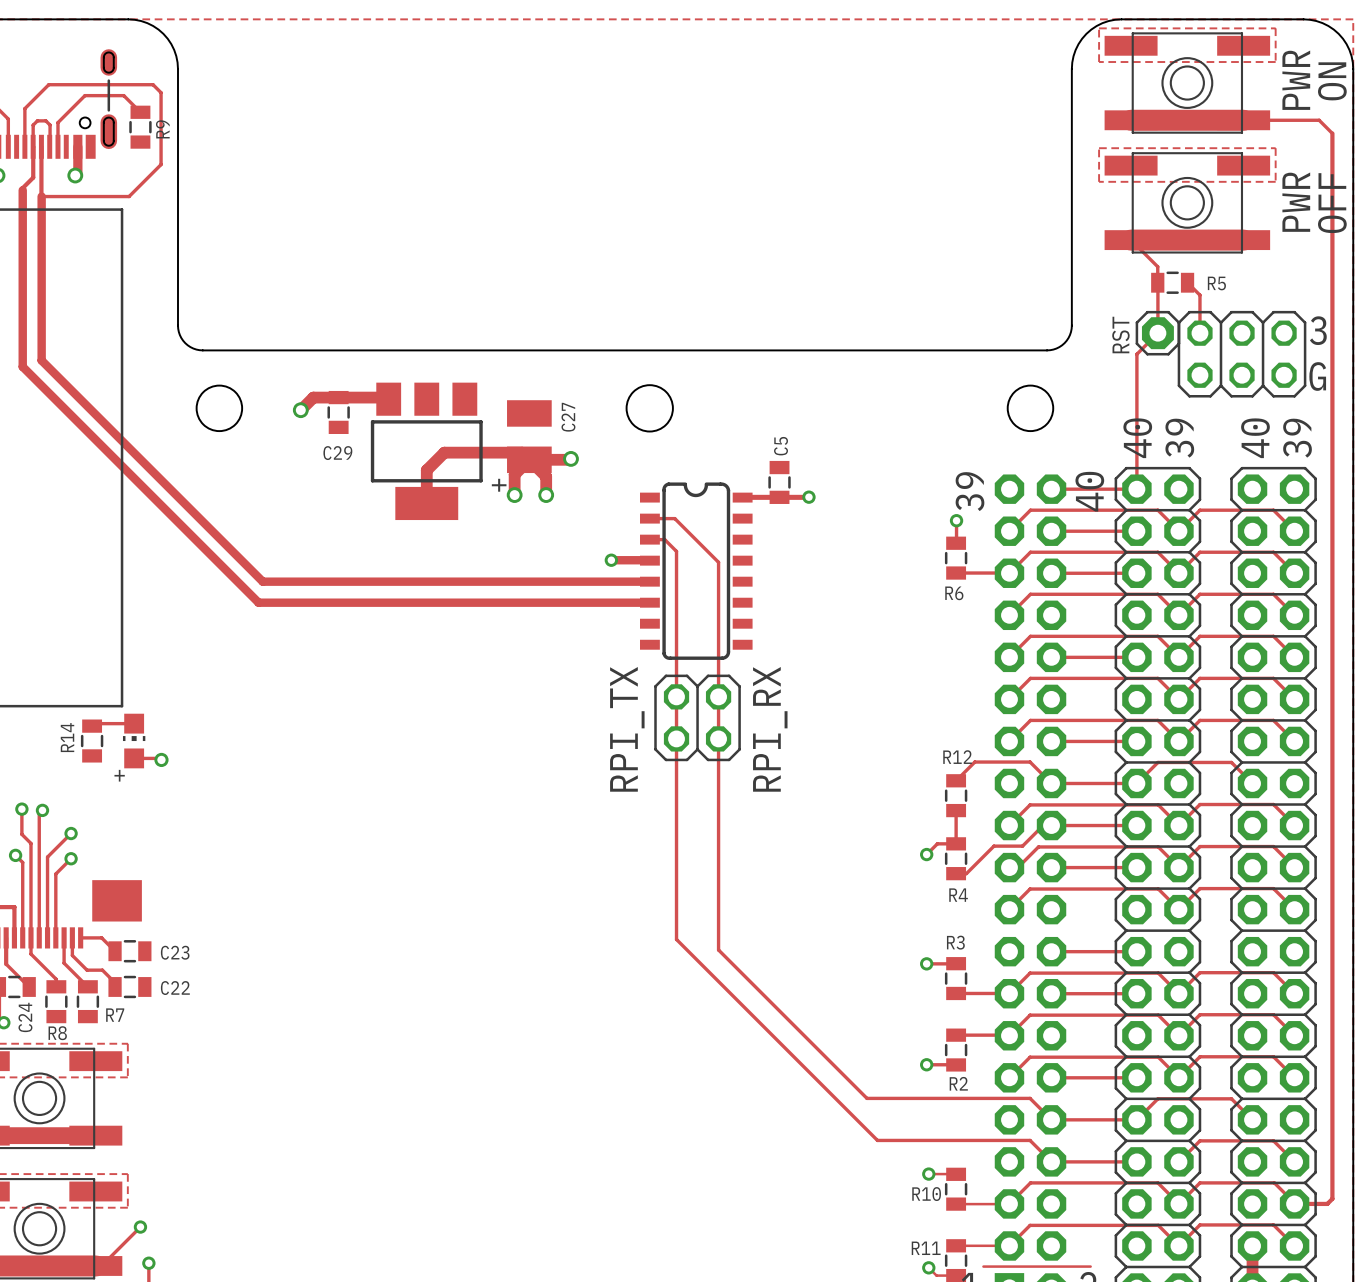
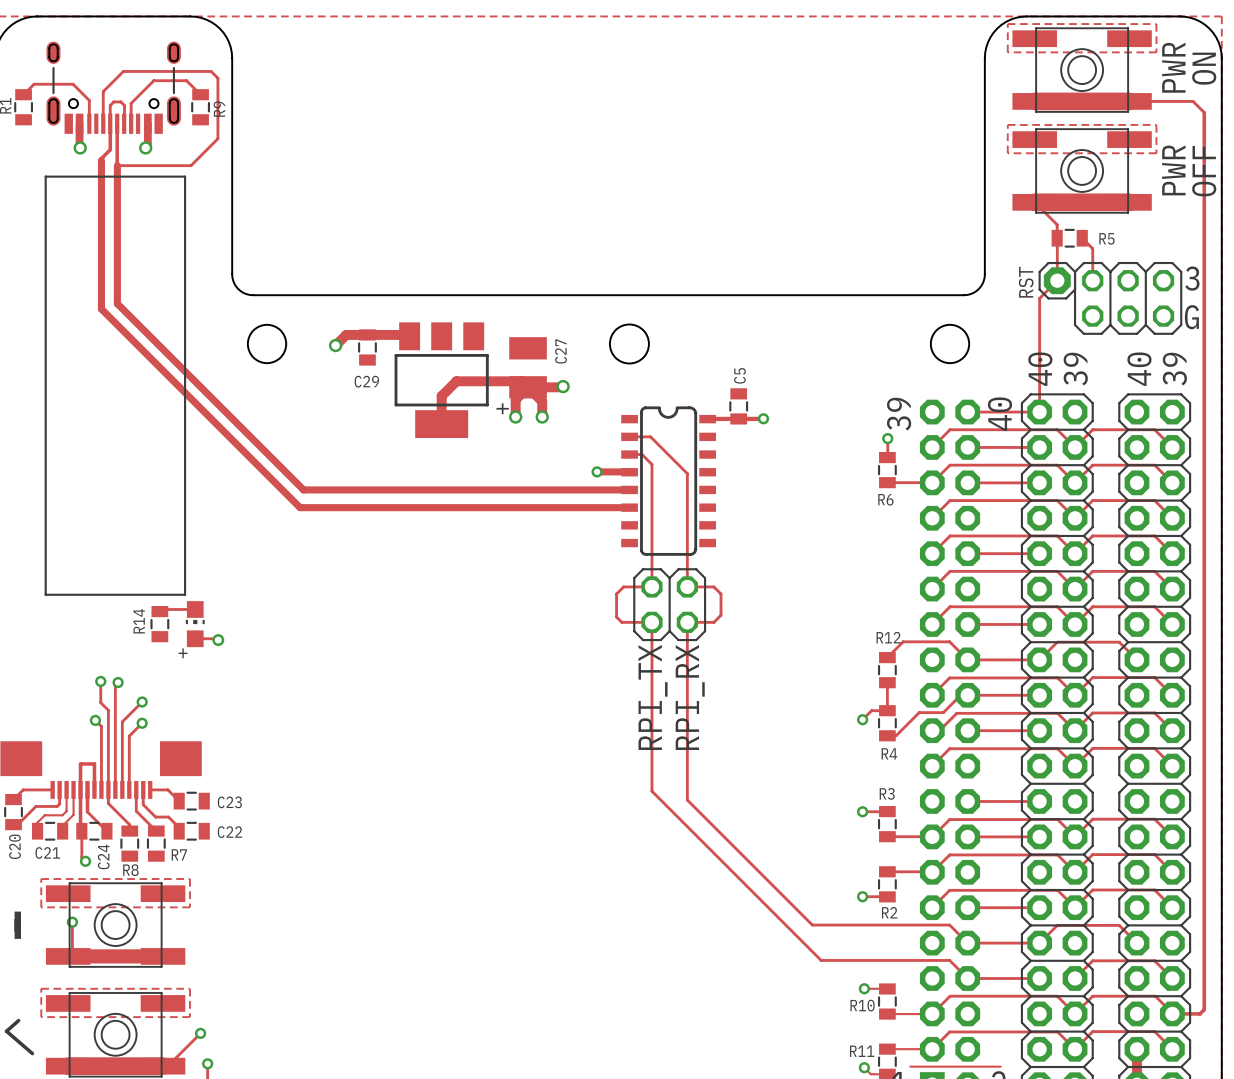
track: (676, 696) (676, 738) -> (651, 586) (623, 586) (616, 594) (616, 617) (621, 622) (651, 622)
track: (718, 696) (718, 738) -> (687, 586) (713, 586) (721, 594) (721, 615) (713, 622) (687, 622)
text position: RPI_TX (627, 729) -> RPI_TX (653, 697)
text position: RPI_RX (770, 729) -> RPI_RX (690, 697)

